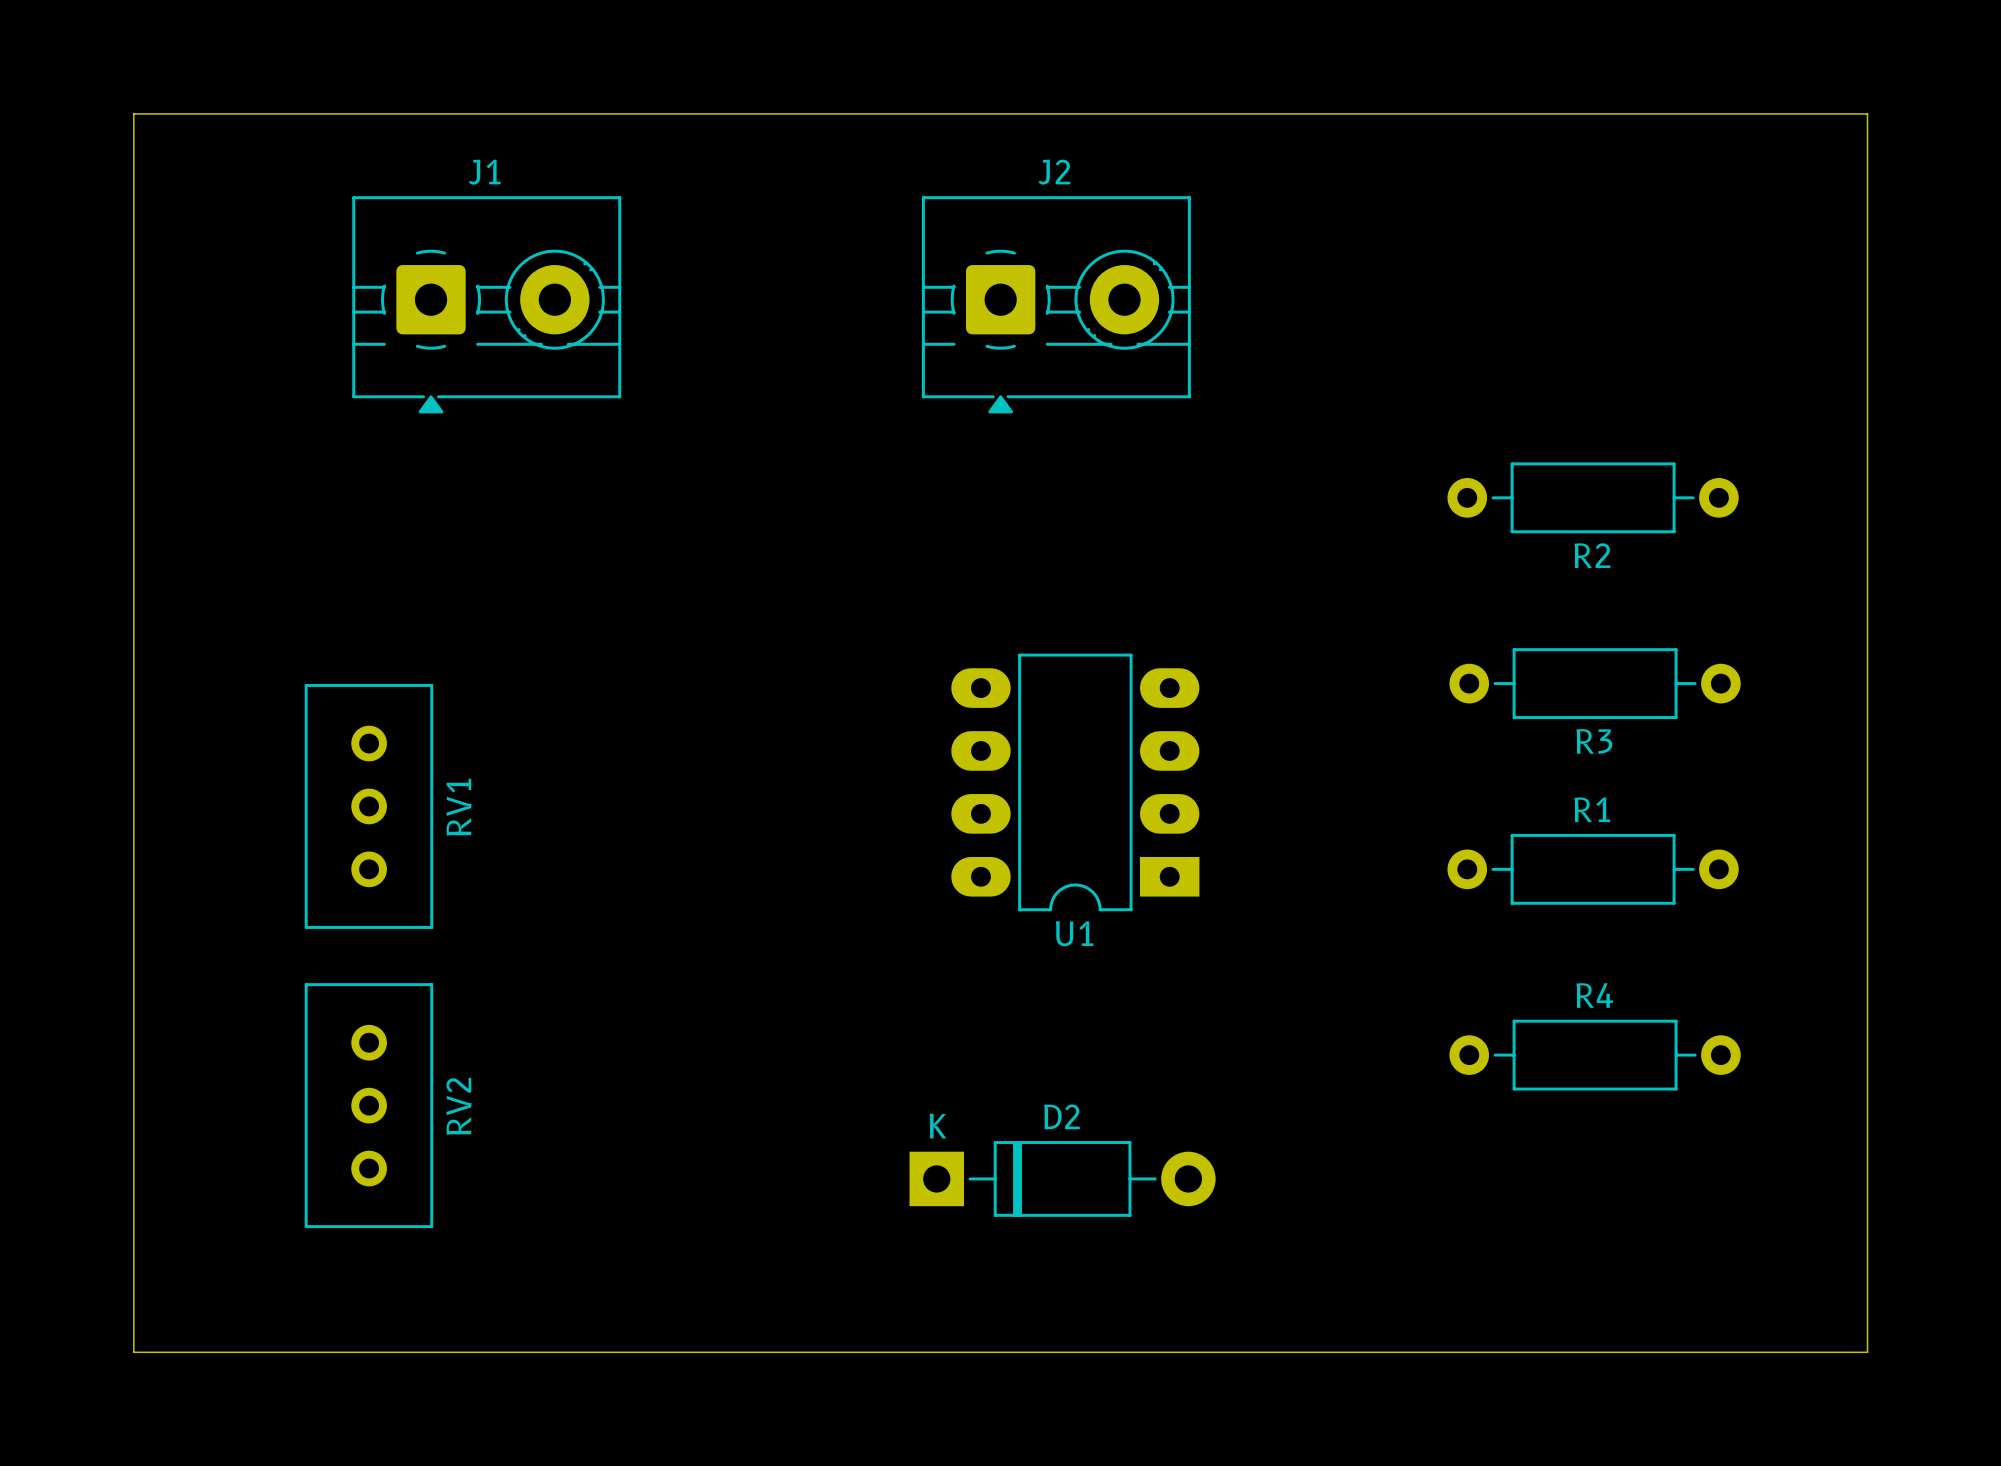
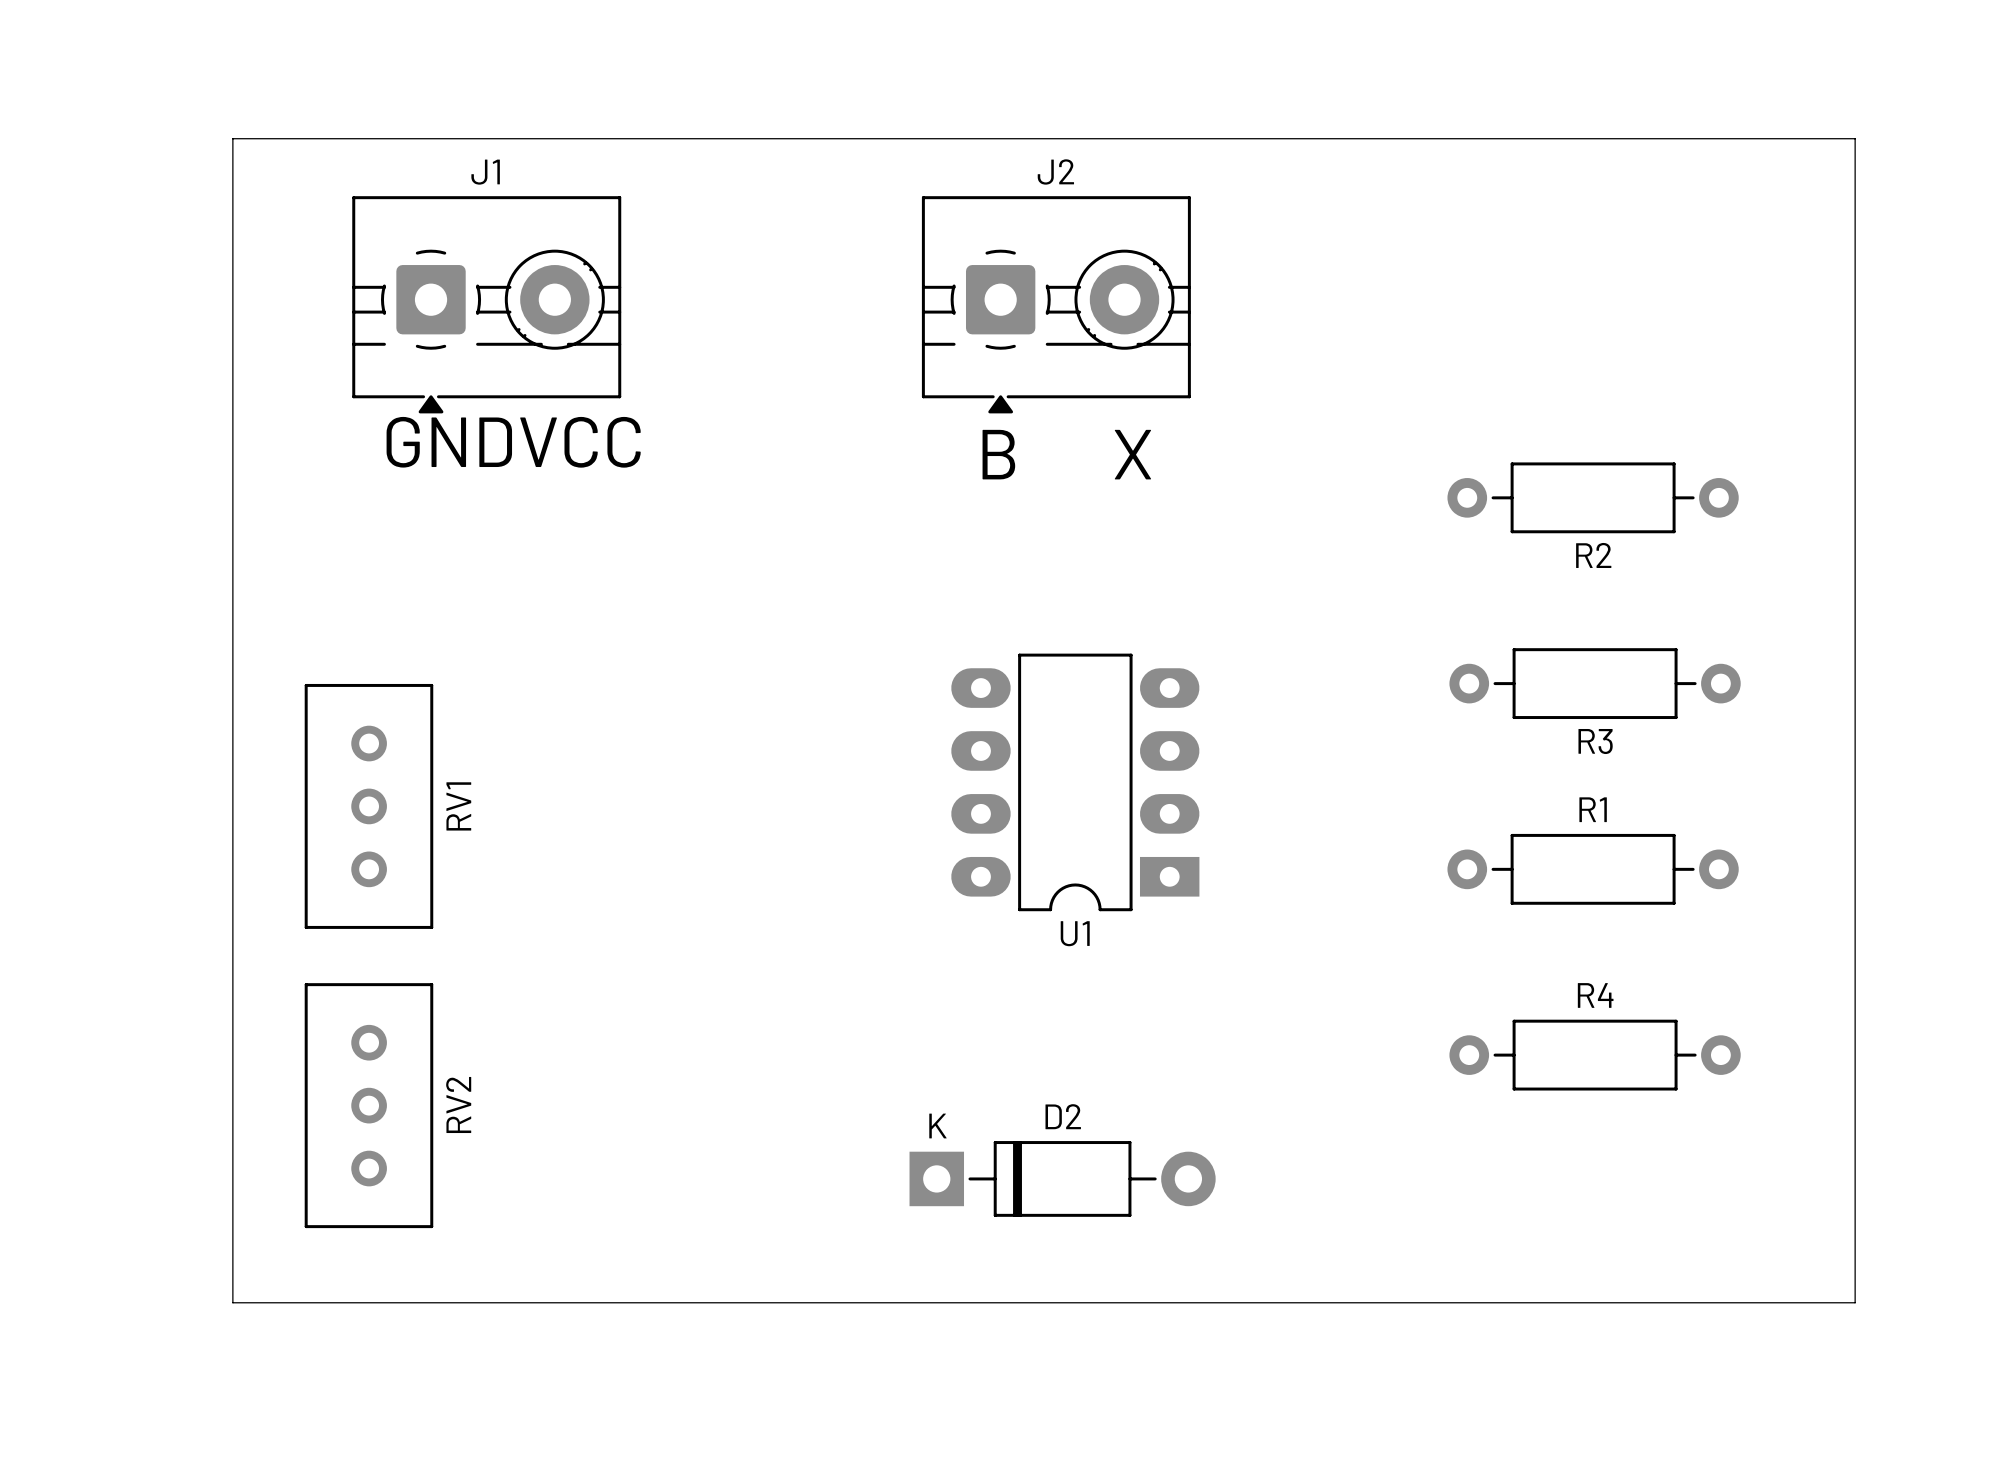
board edge: (133, 113) (1867, 113) (1867, 1352) (133, 1352) (133, 113) -> (232, 138) (232, 1302) (1855, 1302) (1855, 138) (232, 138)
text: none -> GND (449, 442)
text: none -> VCC (580, 442)
text: none -> B (998, 454)
text: none -> X (1132, 454)

